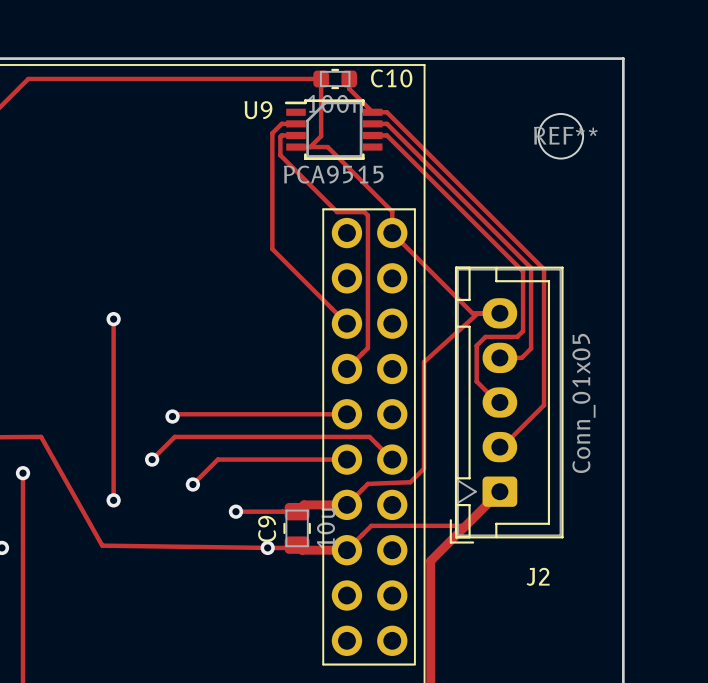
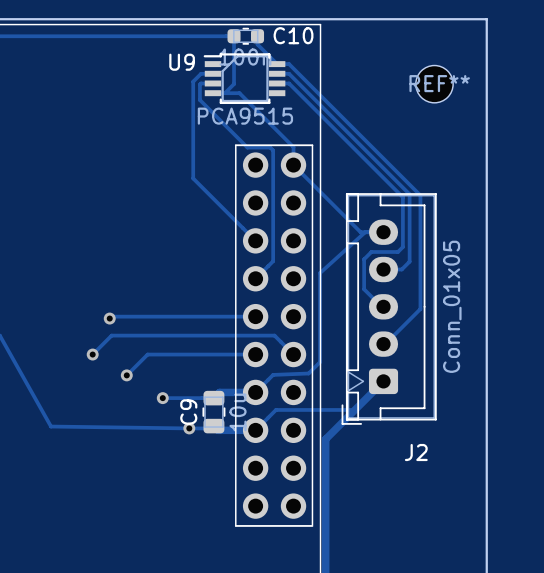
track: (113, 319) (113, 500) -> none
via: (113, 319) -> none
via: (113, 500) -> none

